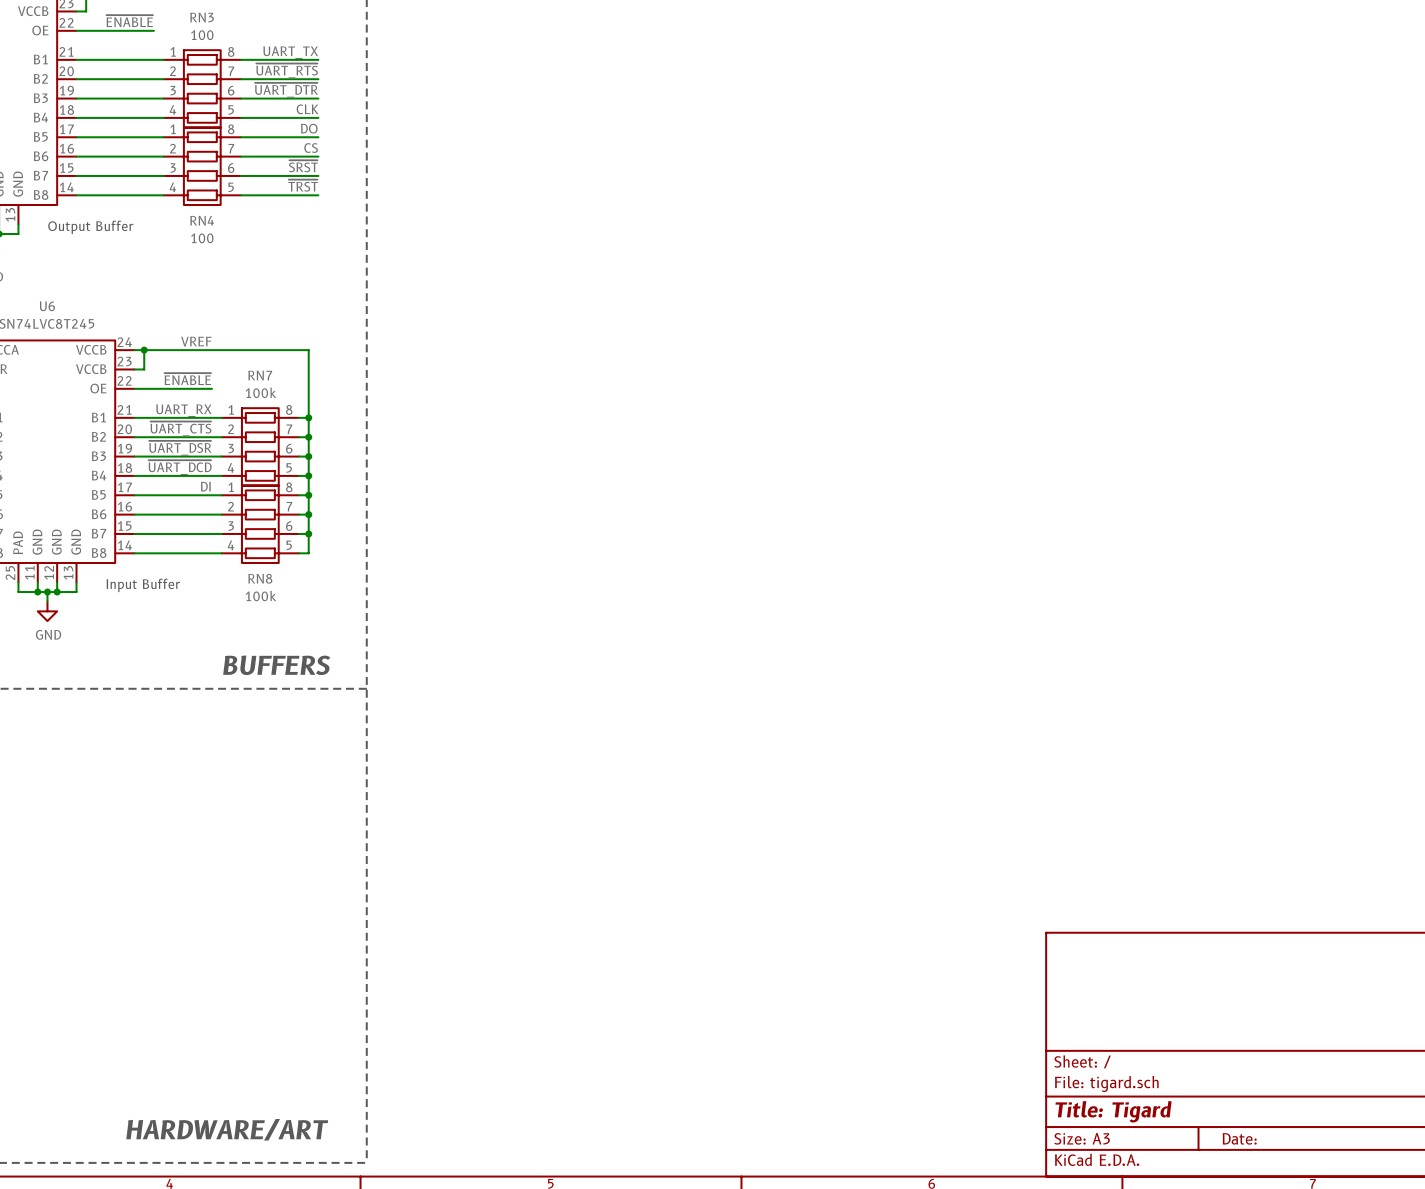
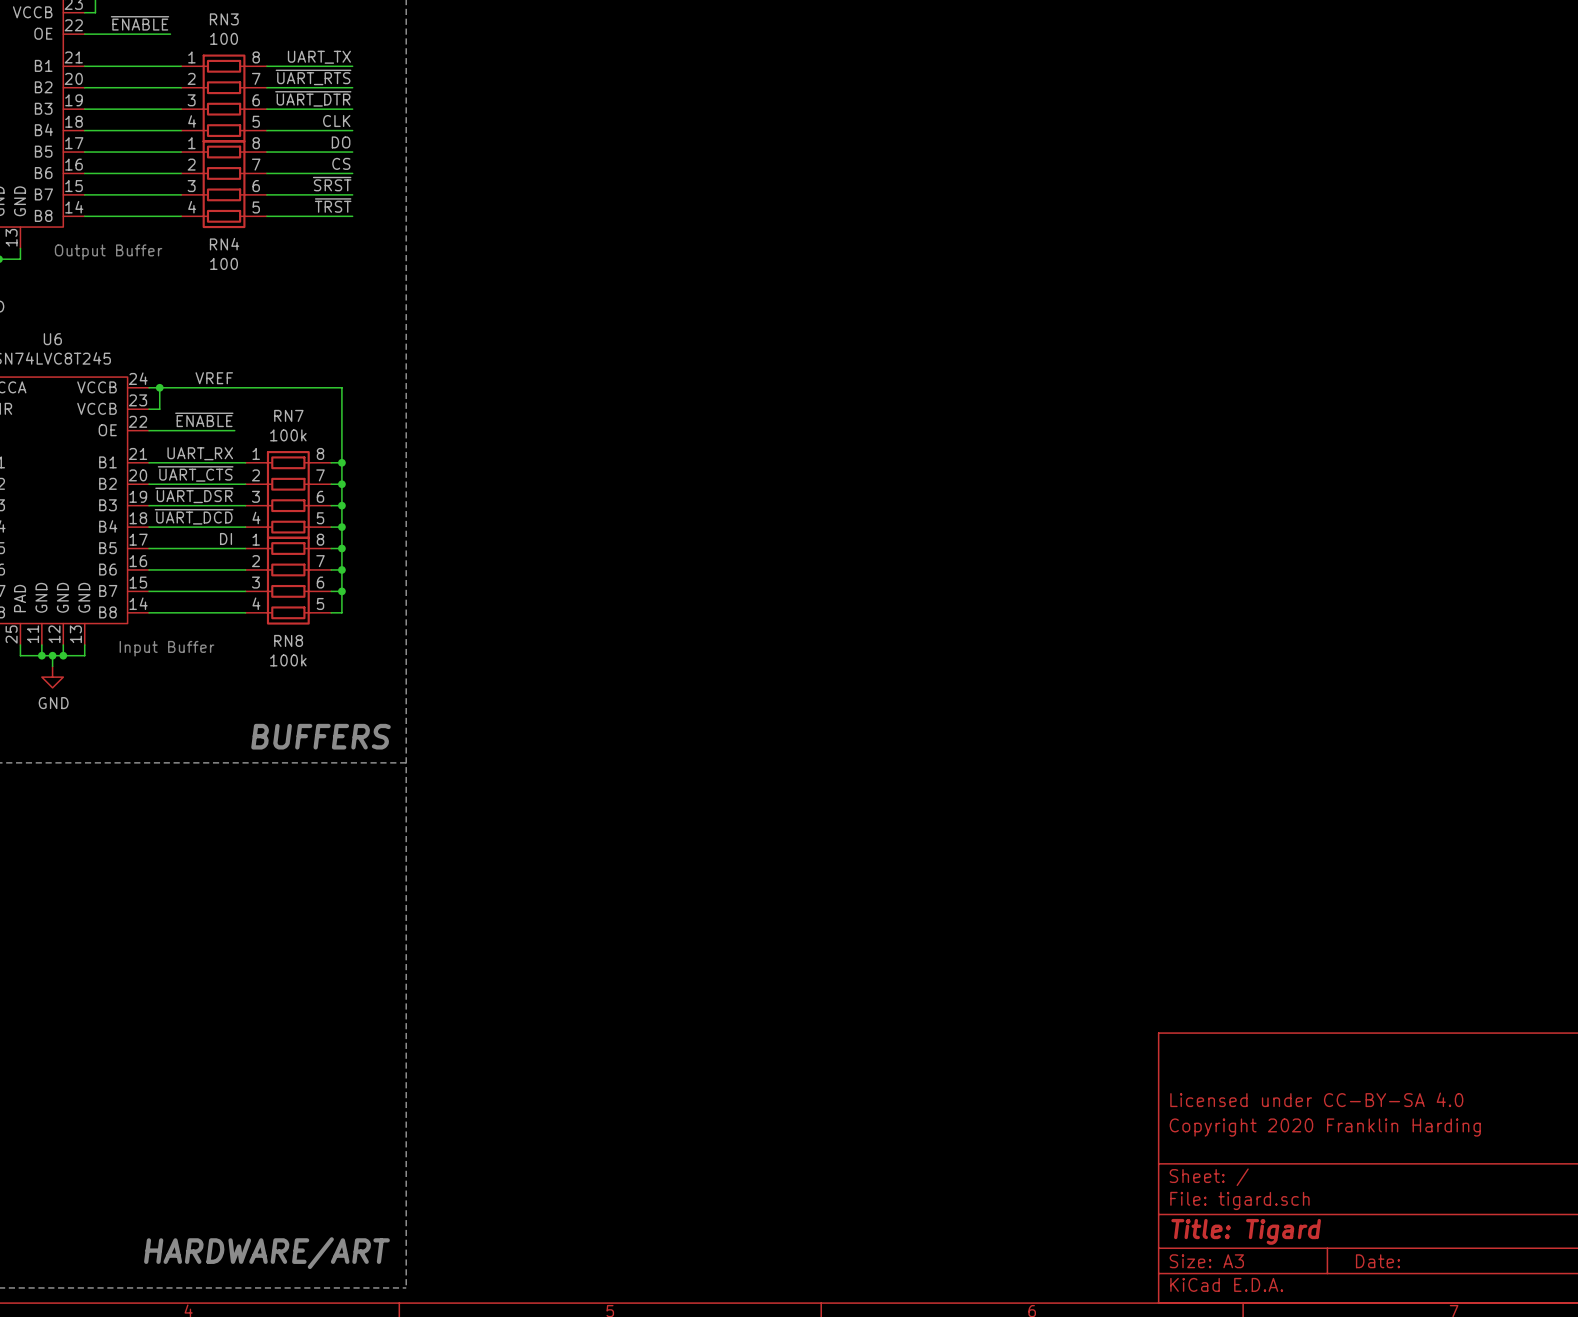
title block: none -> Licensed under CC-BY-SA 4.0 (1316, 1099)
title block: none -> Copyright 2020 Franklin Harding (1325, 1127)

